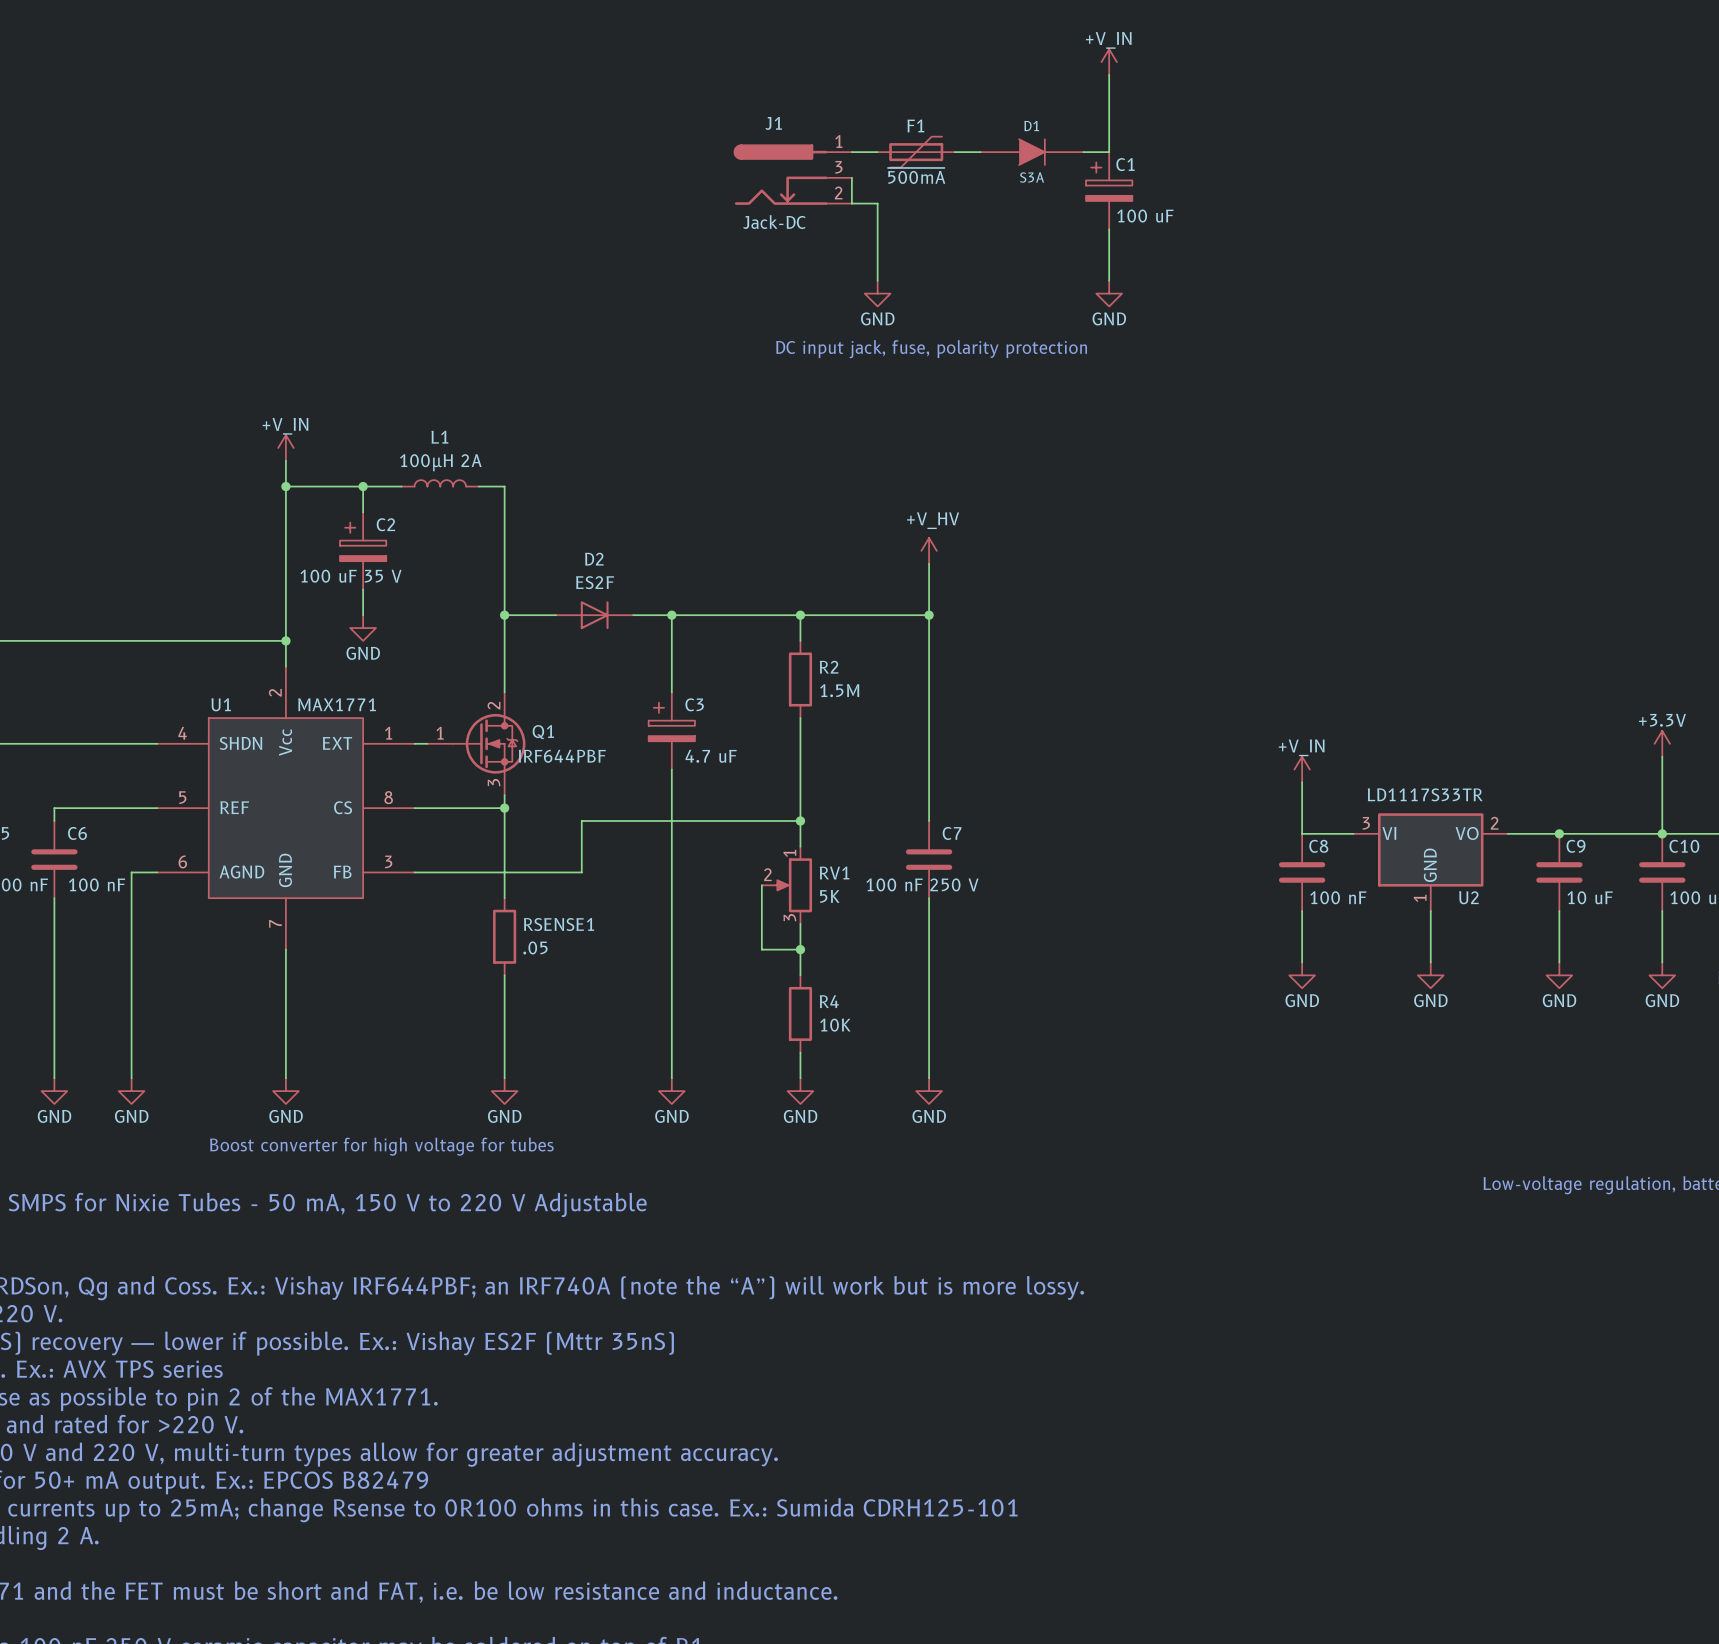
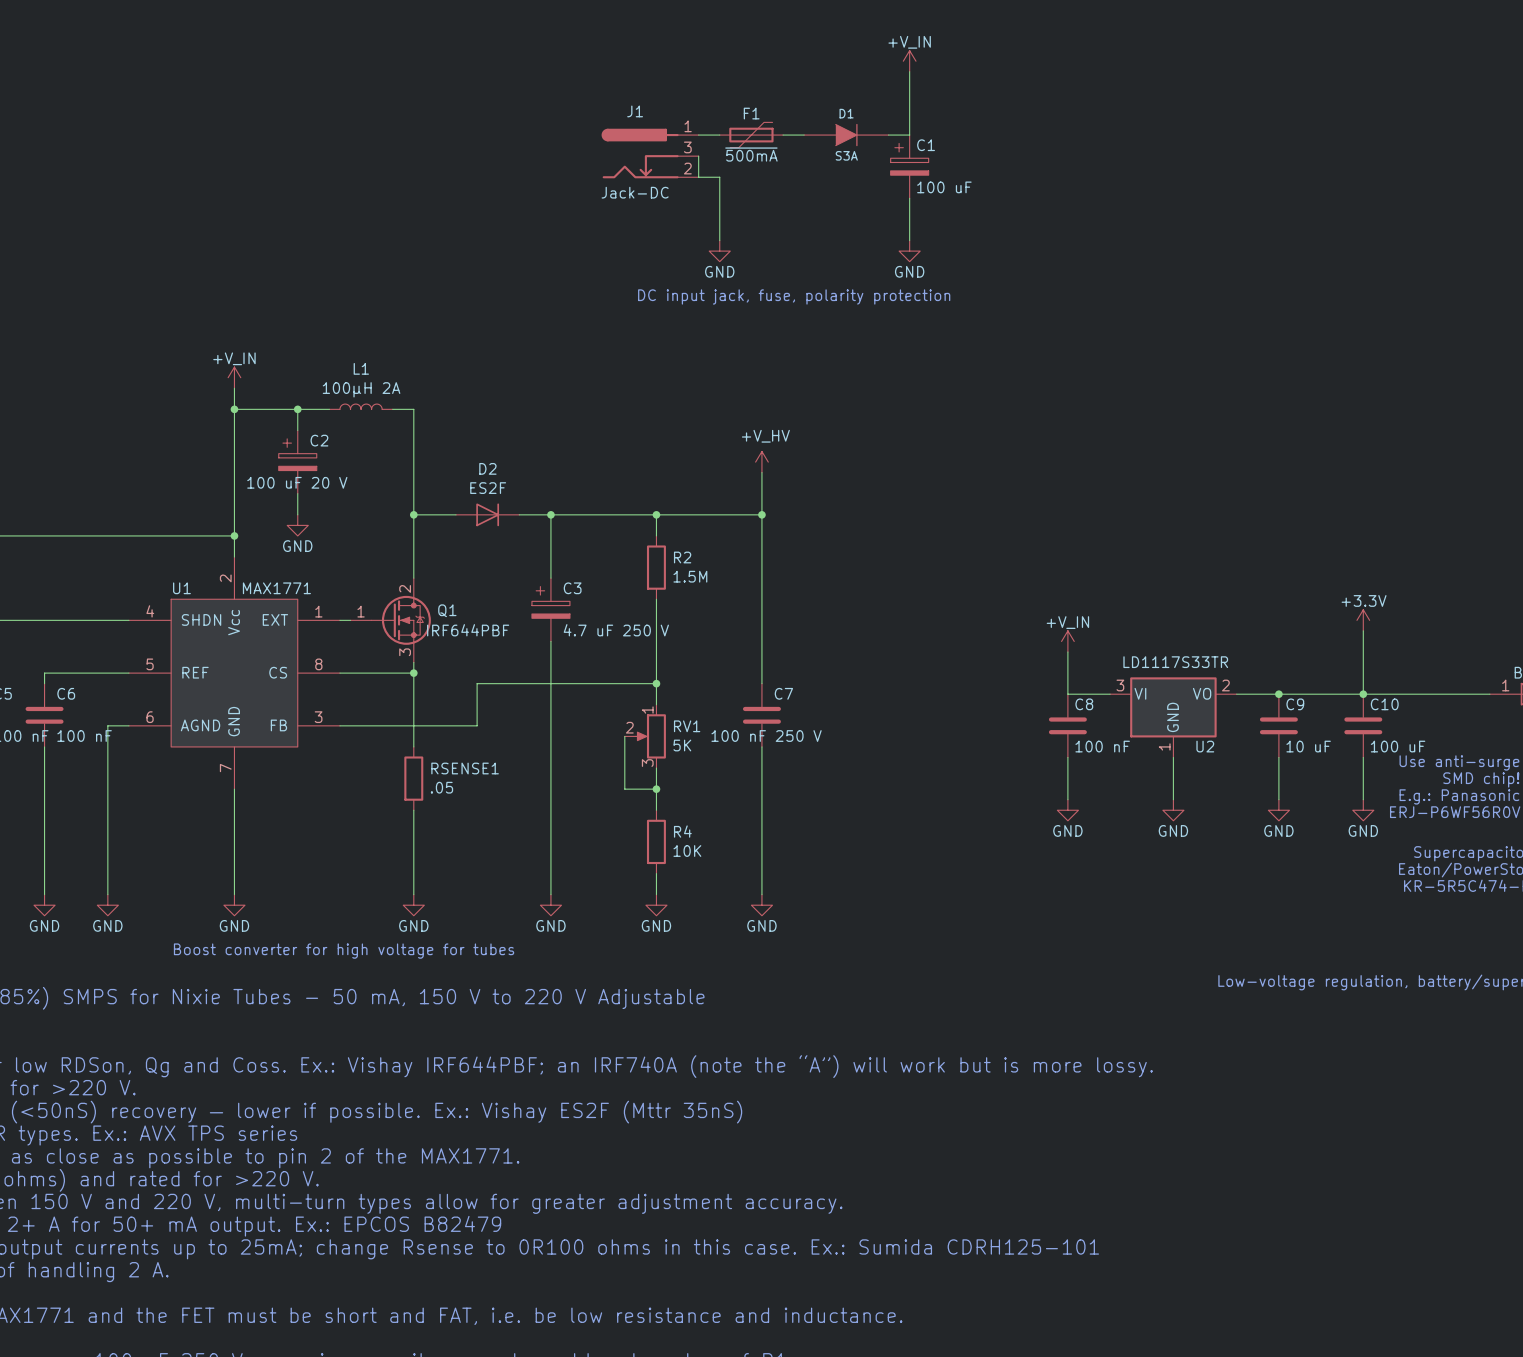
C2 value: 100 uF 35 V (351, 576) -> 100 uF 20 V (297, 482)
C3 value: 4.7 uF (711, 756) -> 4.7 uF 250 V (616, 630)

